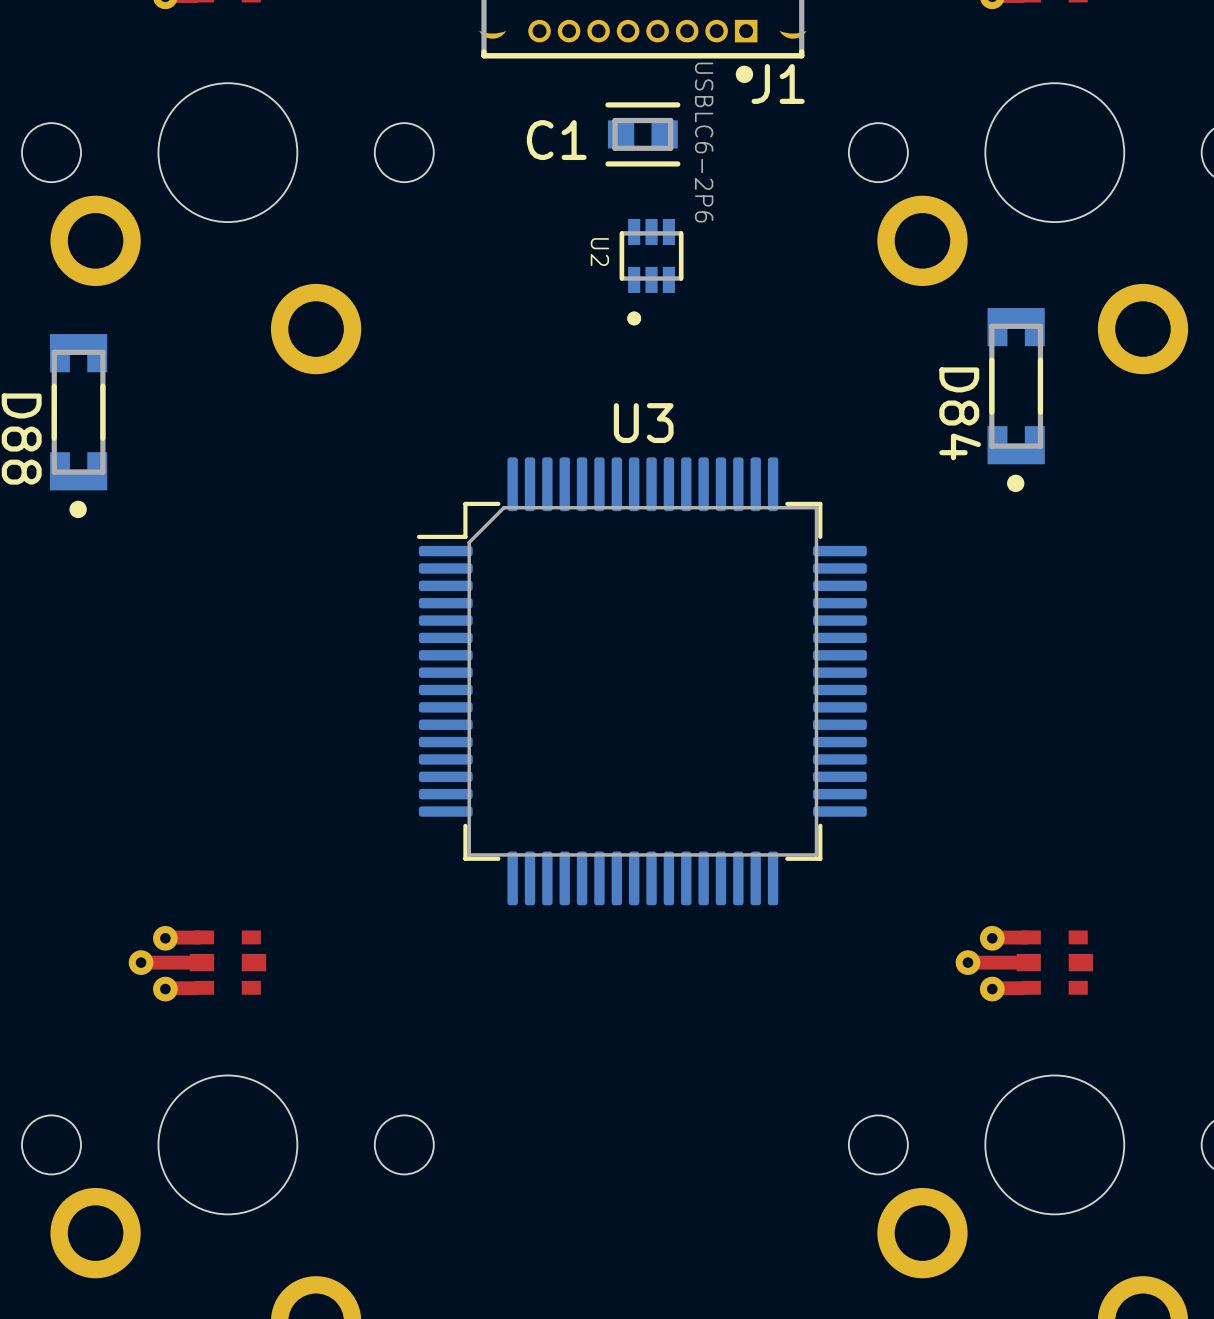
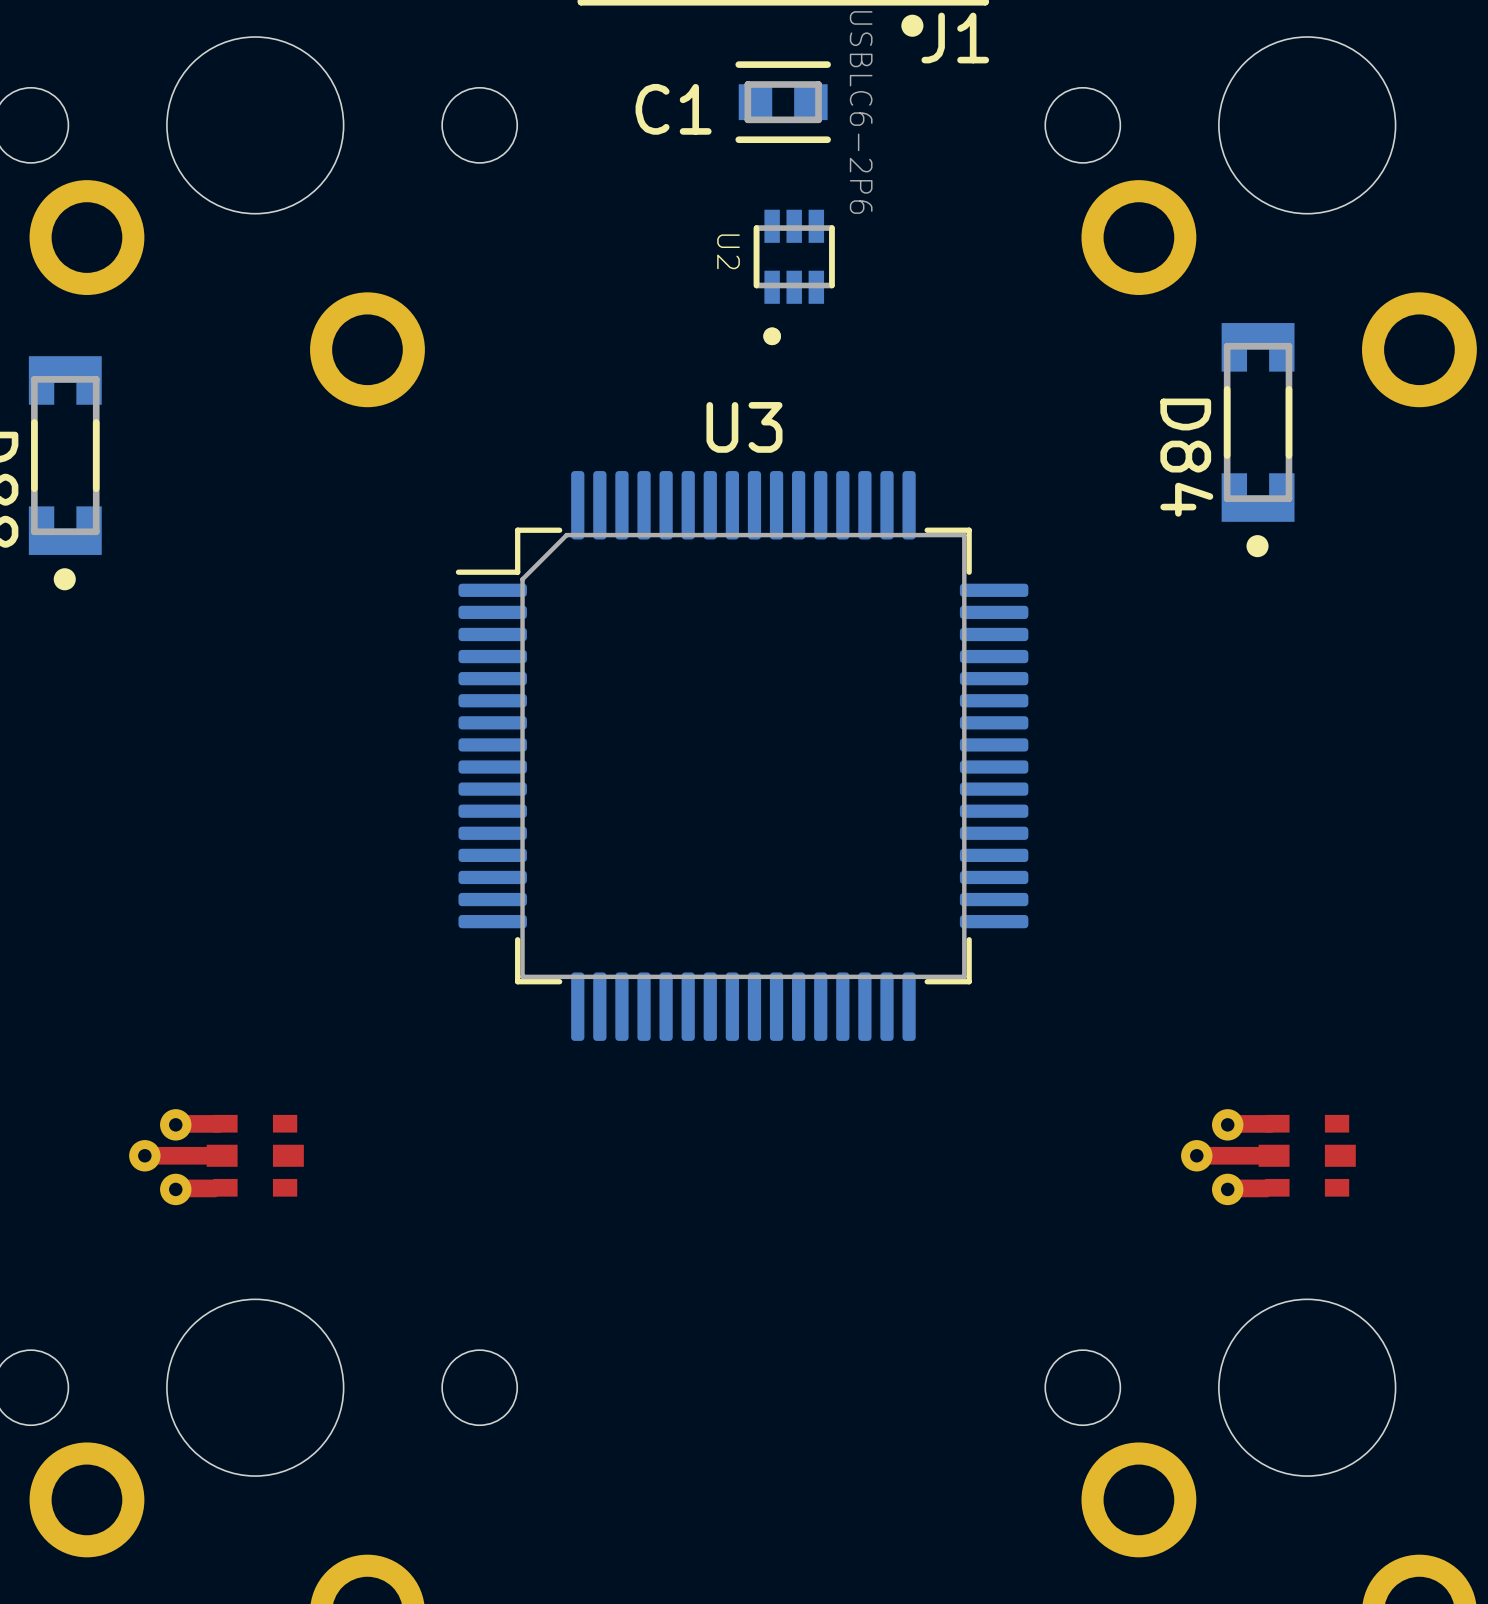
U3 position: (641, 681) -> (742, 755)

